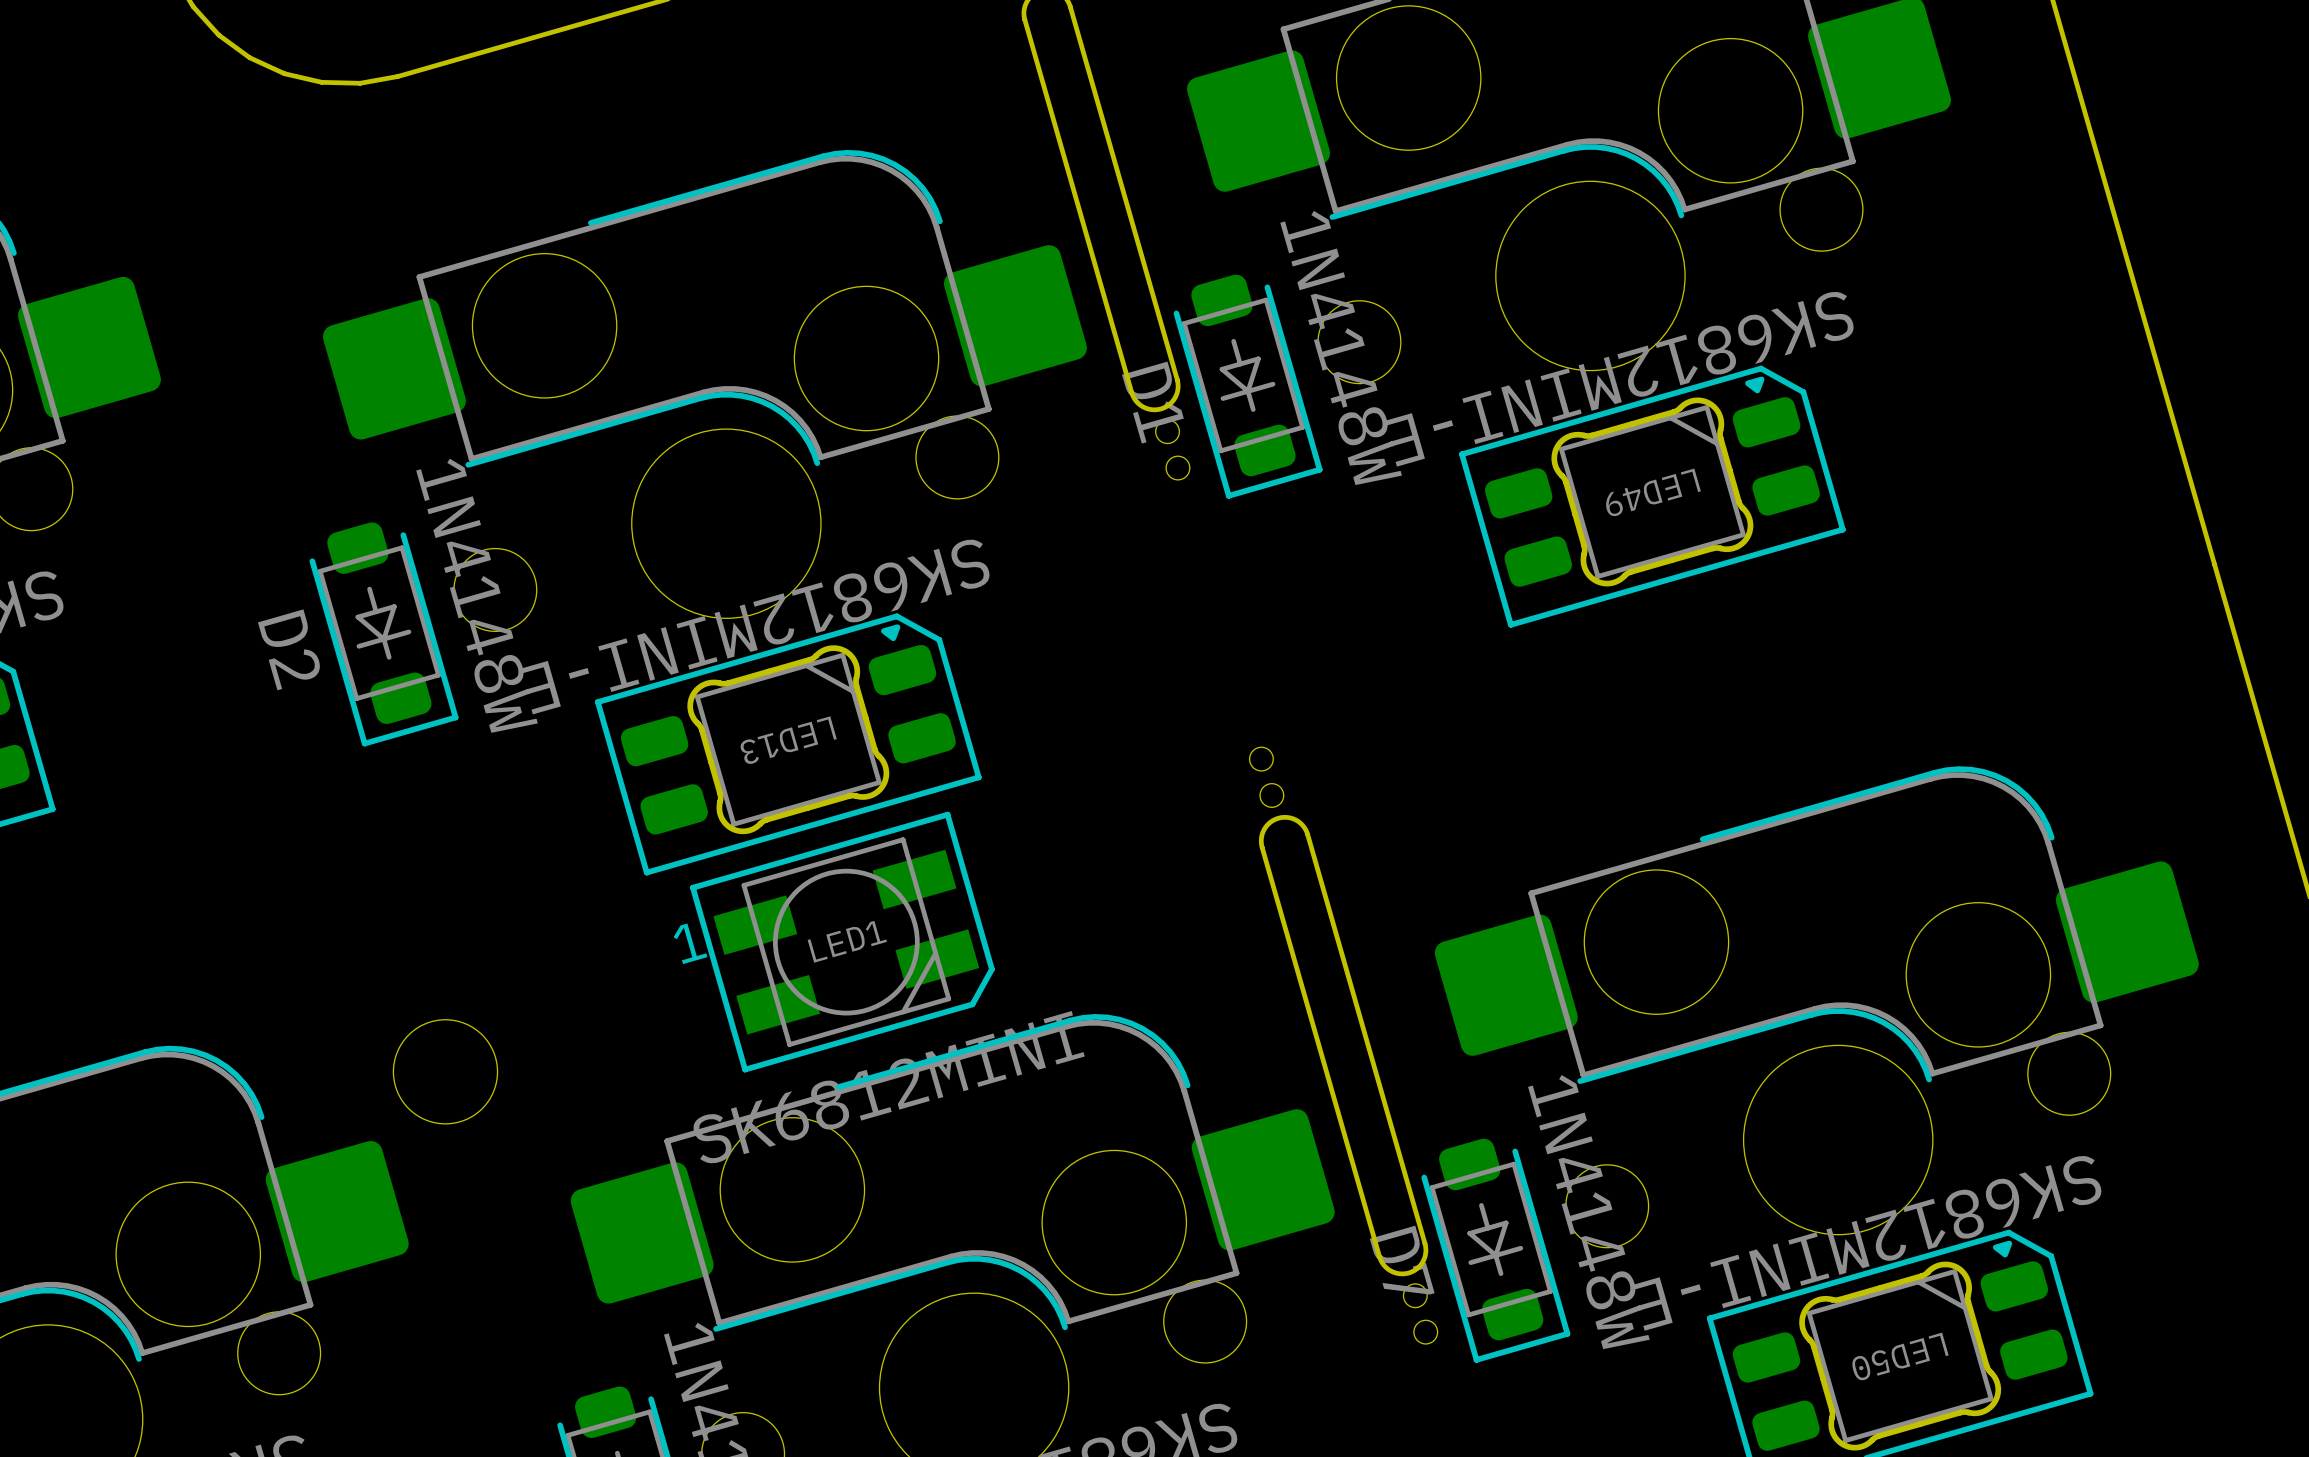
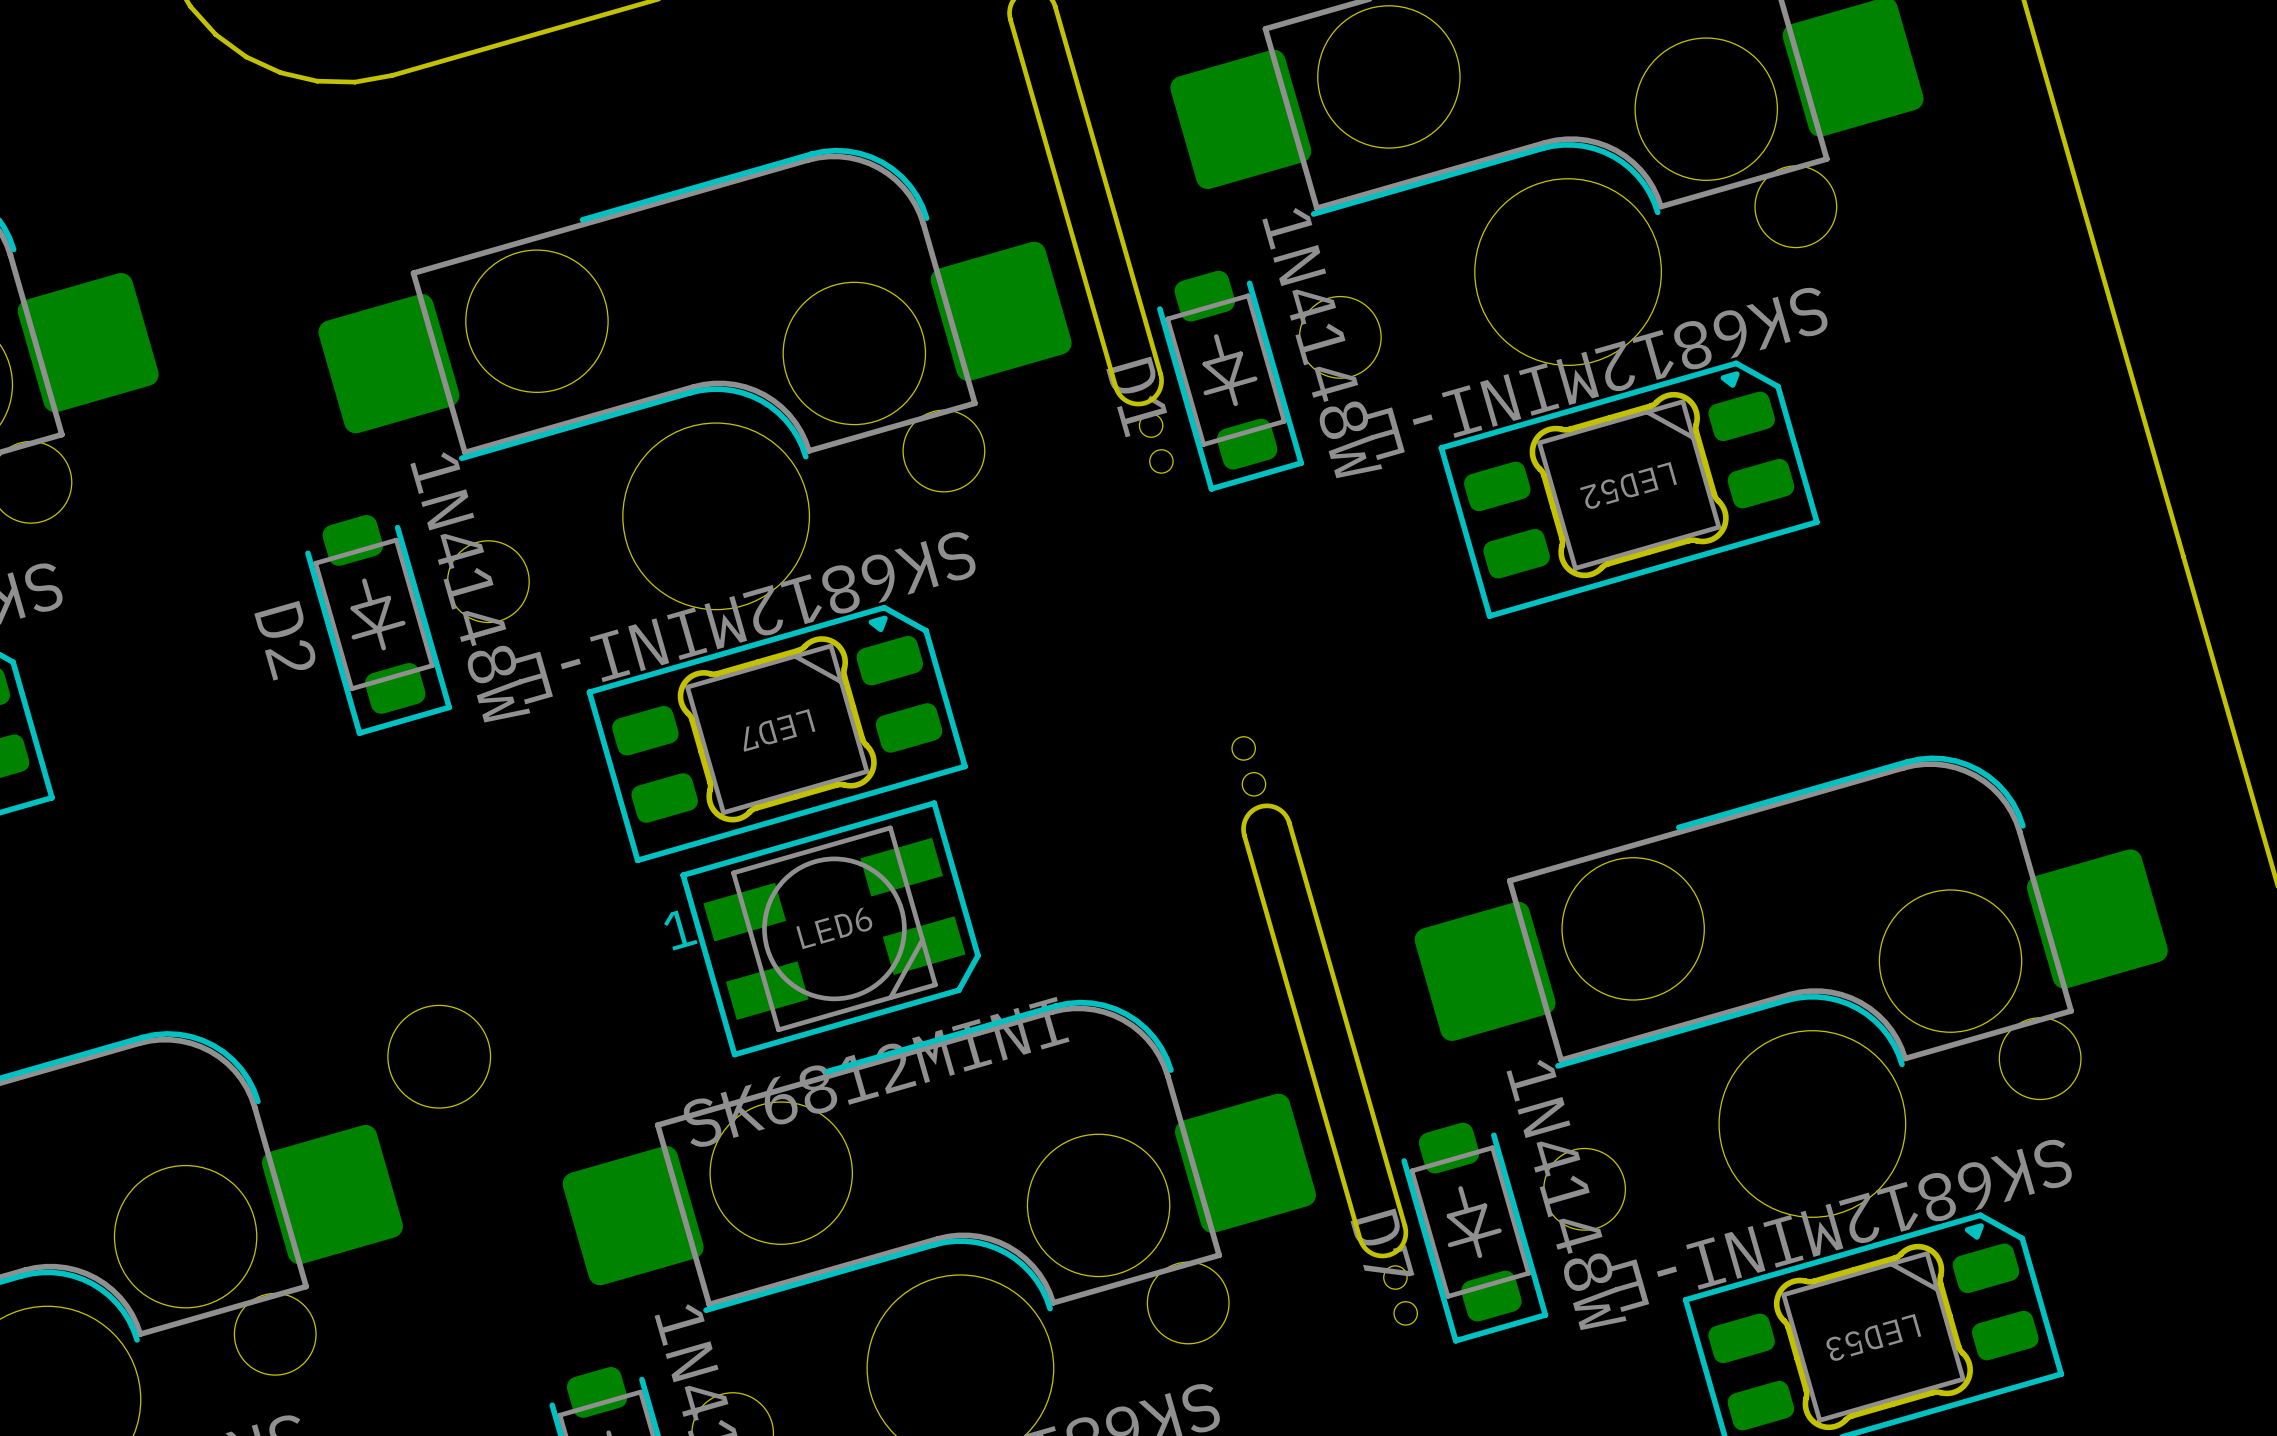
LED49 name: LED49 (1653, 492) -> LED52 (1628, 485)
LED13 name: LED13 (788, 740) -> LED7 (779, 730)
LED1 name: LED1 (847, 941) -> LED6 (834, 928)
LED50 name: LED50 (1900, 1356) -> LED53 (1873, 1337)

